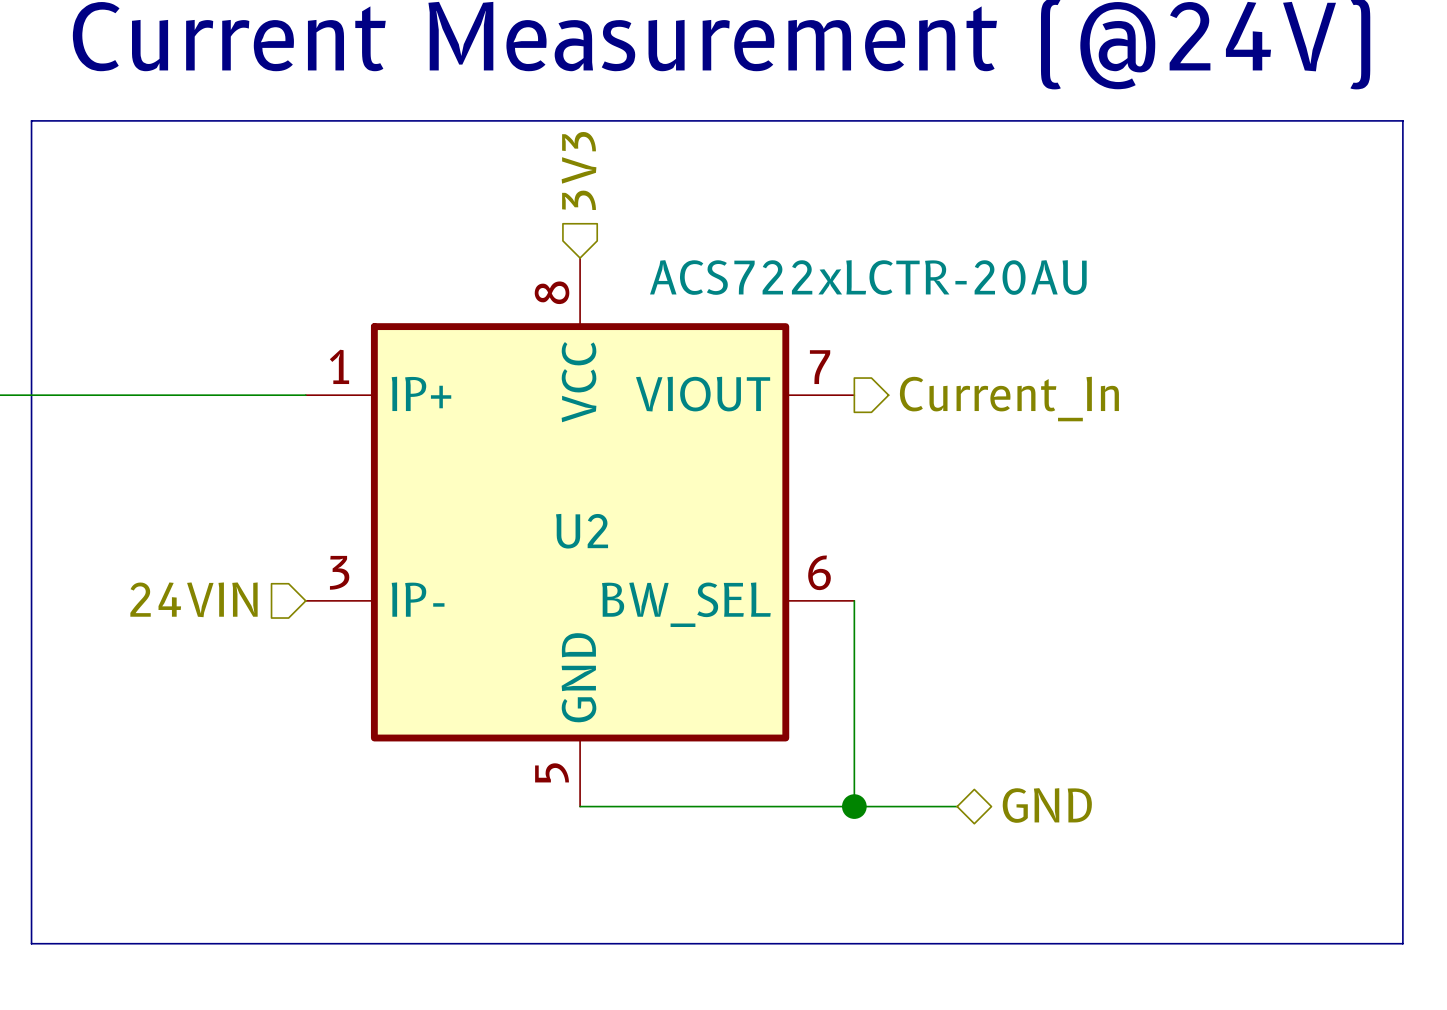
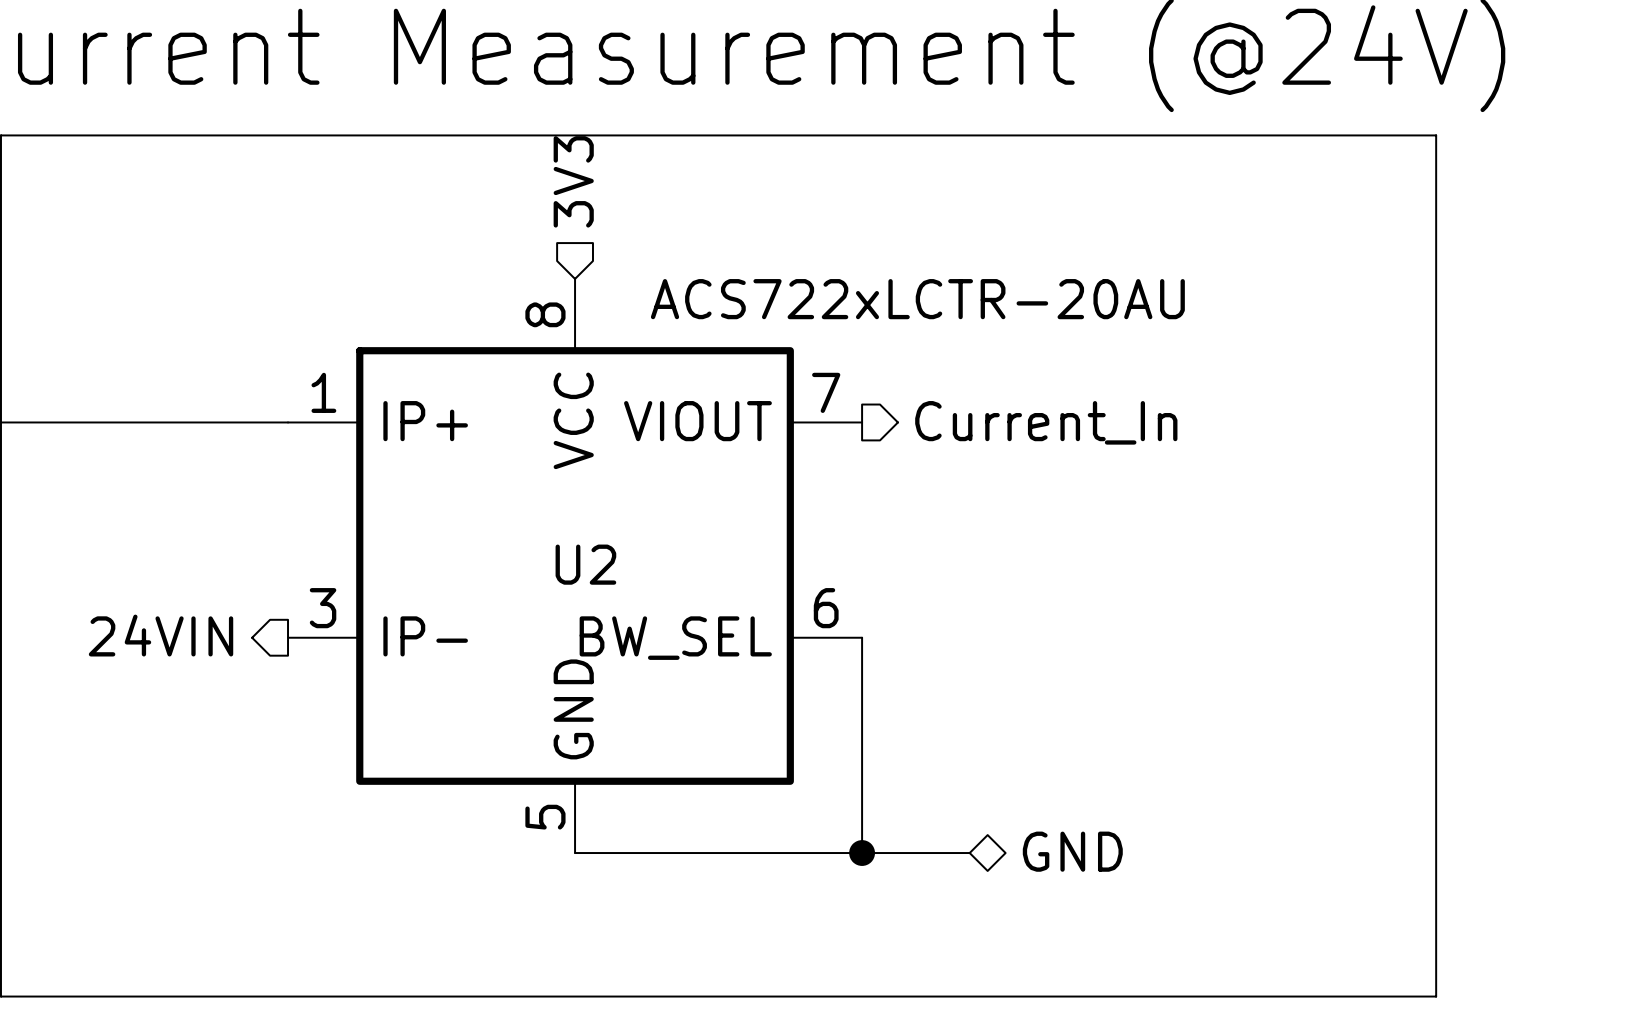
hierarchical label shape: input (194, 599) -> output (161, 635)

